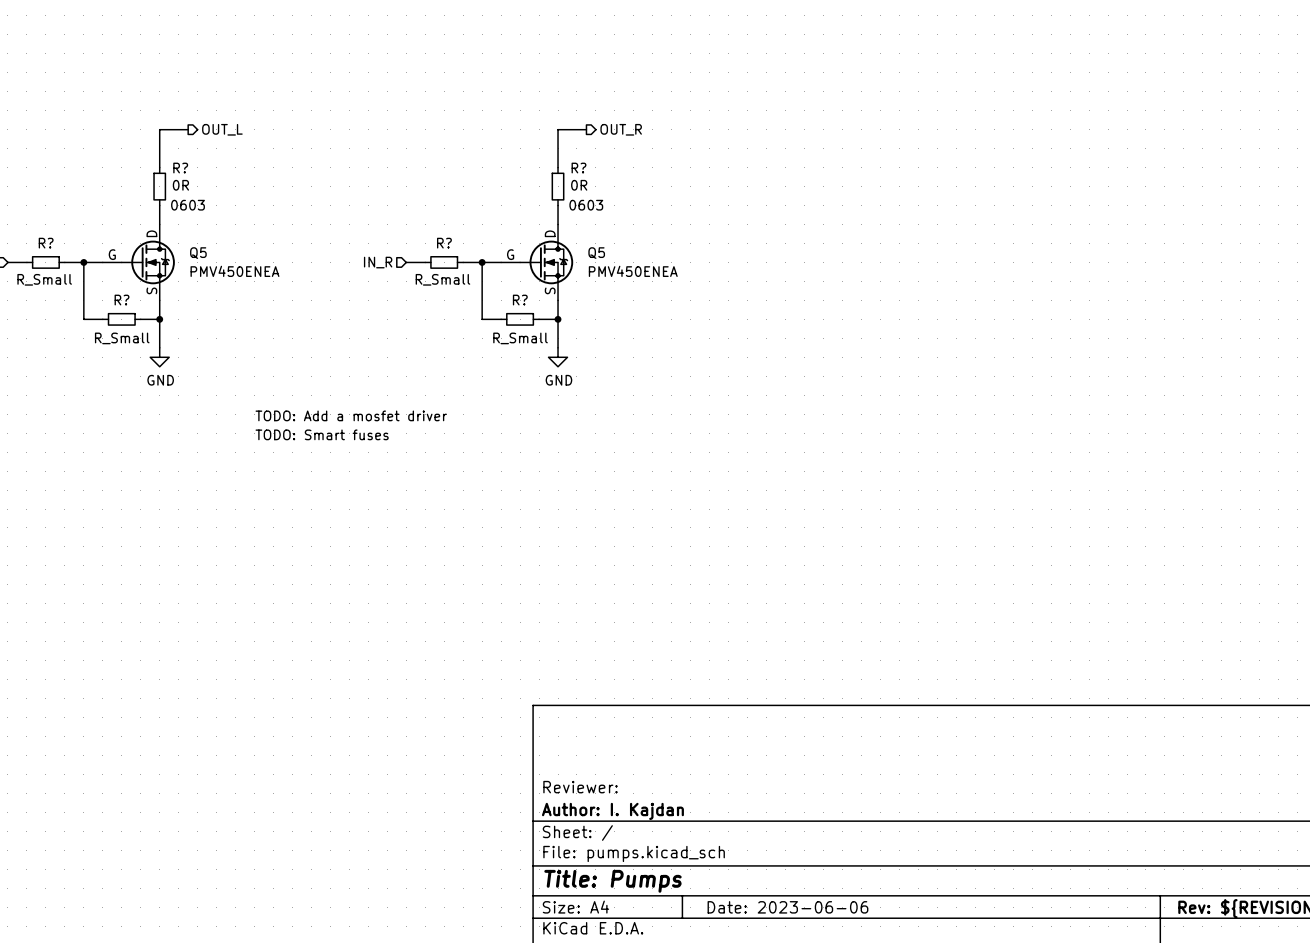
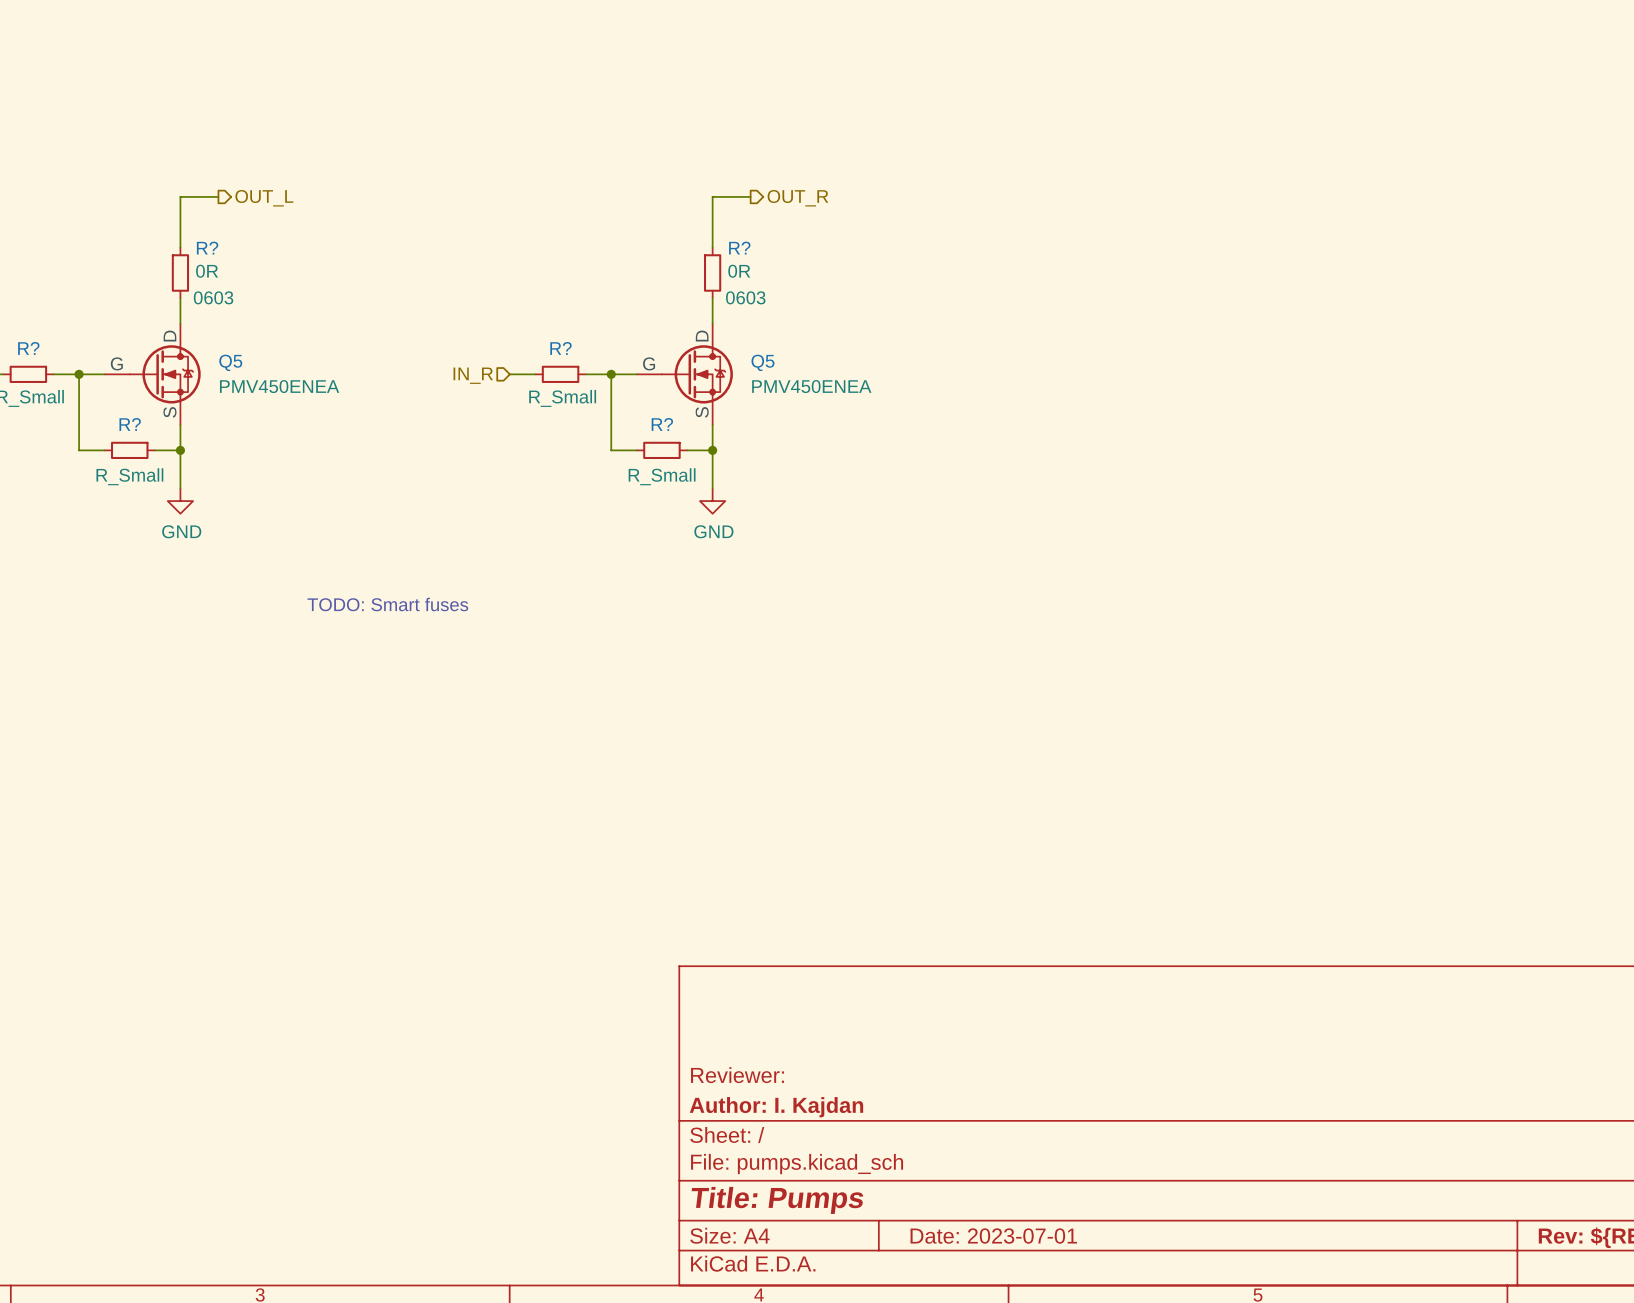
text: TODO: Add a mosfet driver (351, 415) -> none
title block: Date: 2023-06-06 (787, 907) -> Date: 2023-07-01 (993, 1236)

